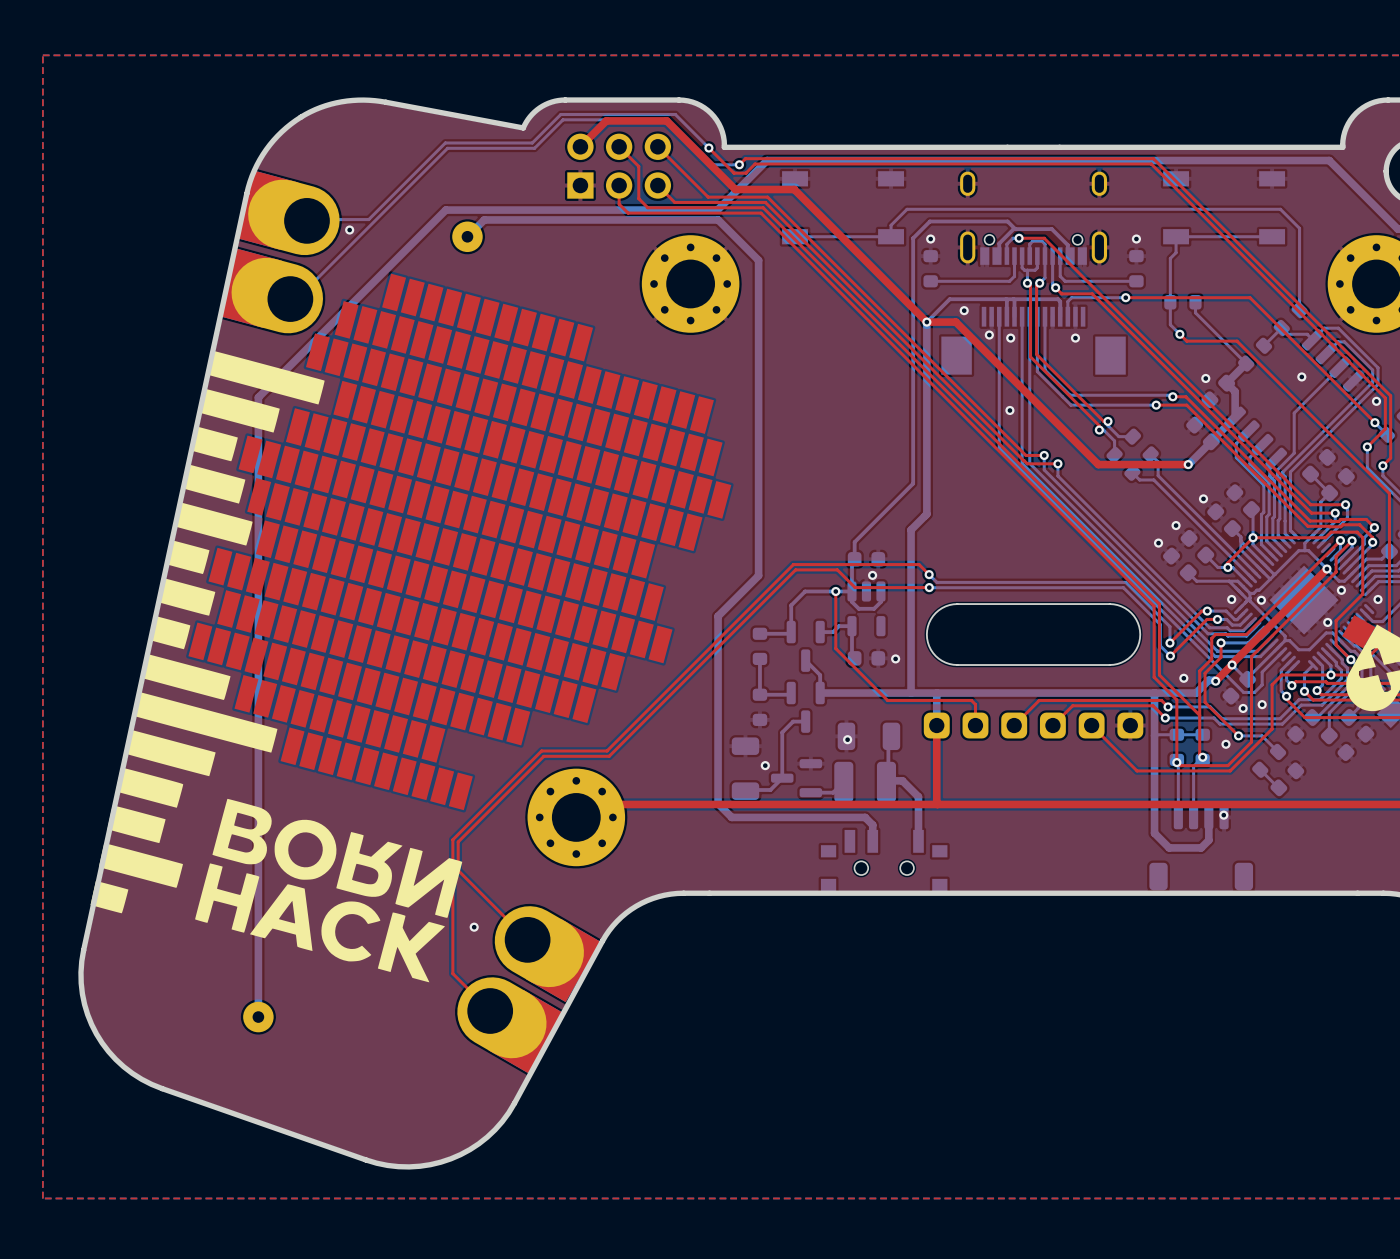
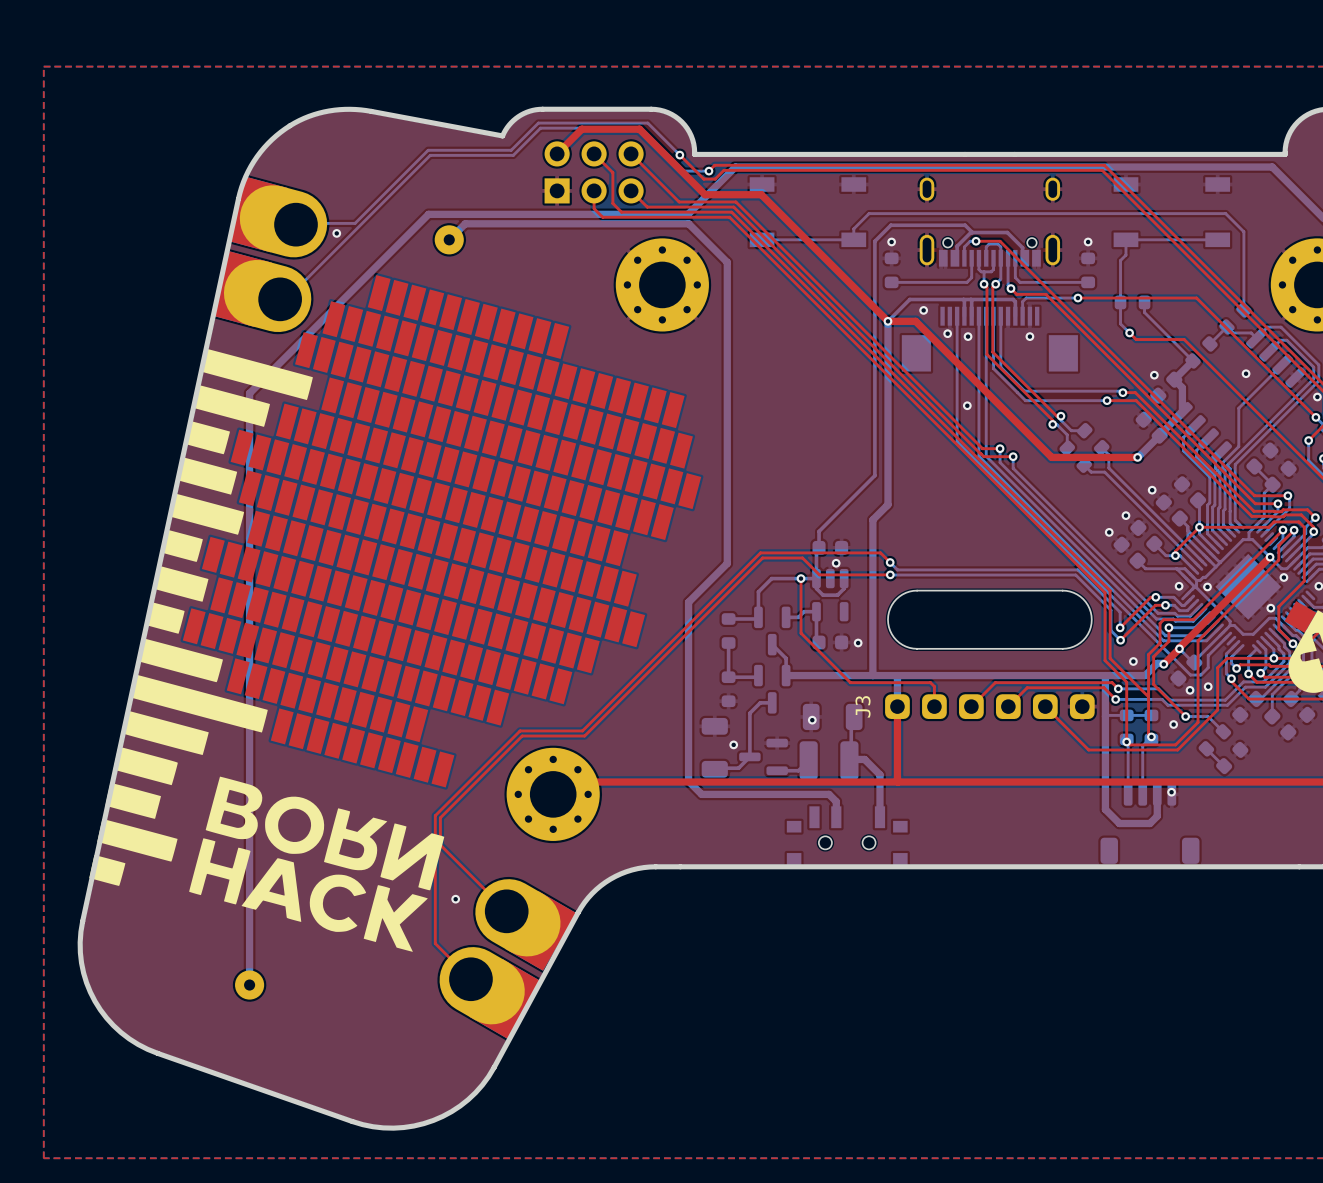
J3 name: none -> J3 (863, 706)

